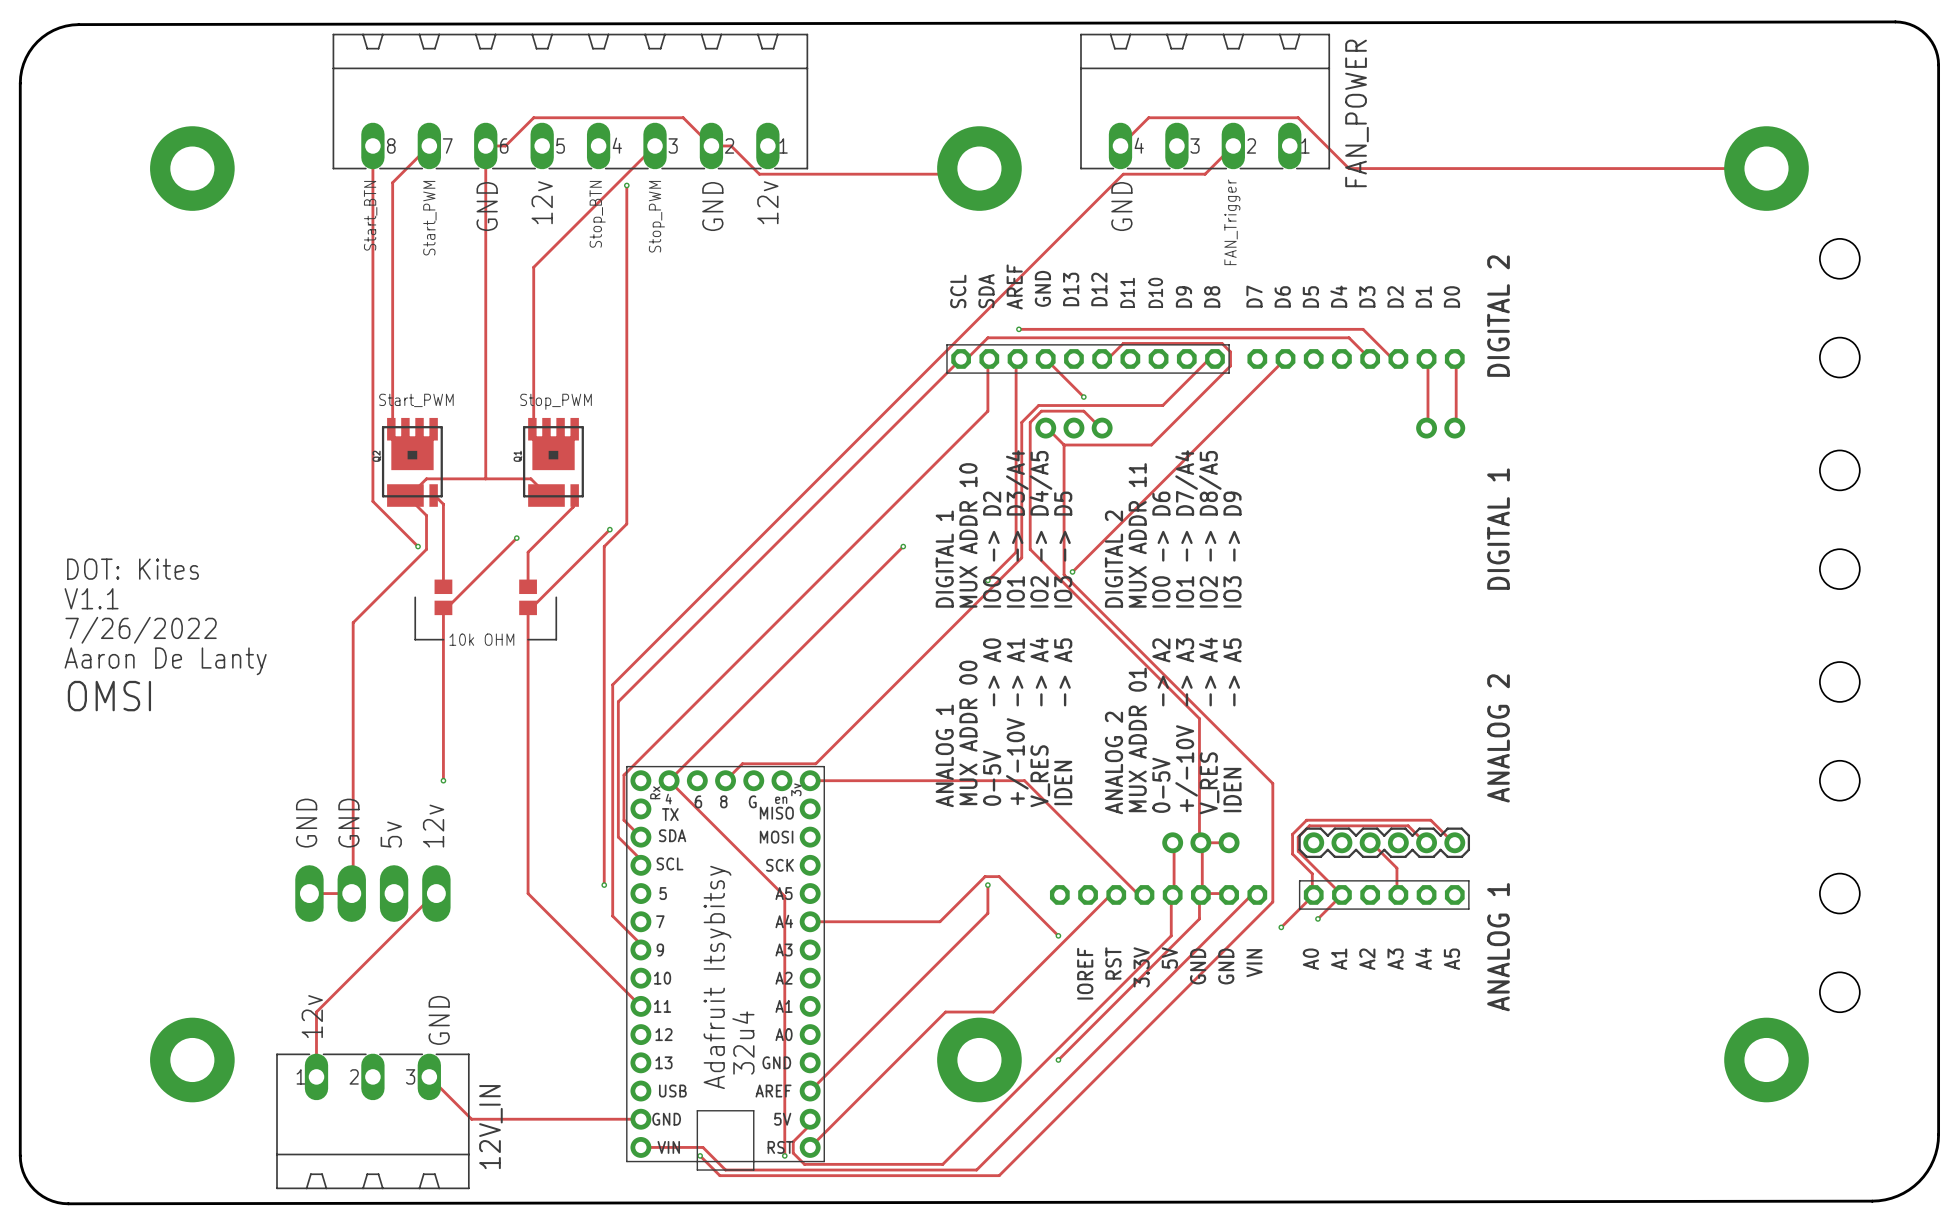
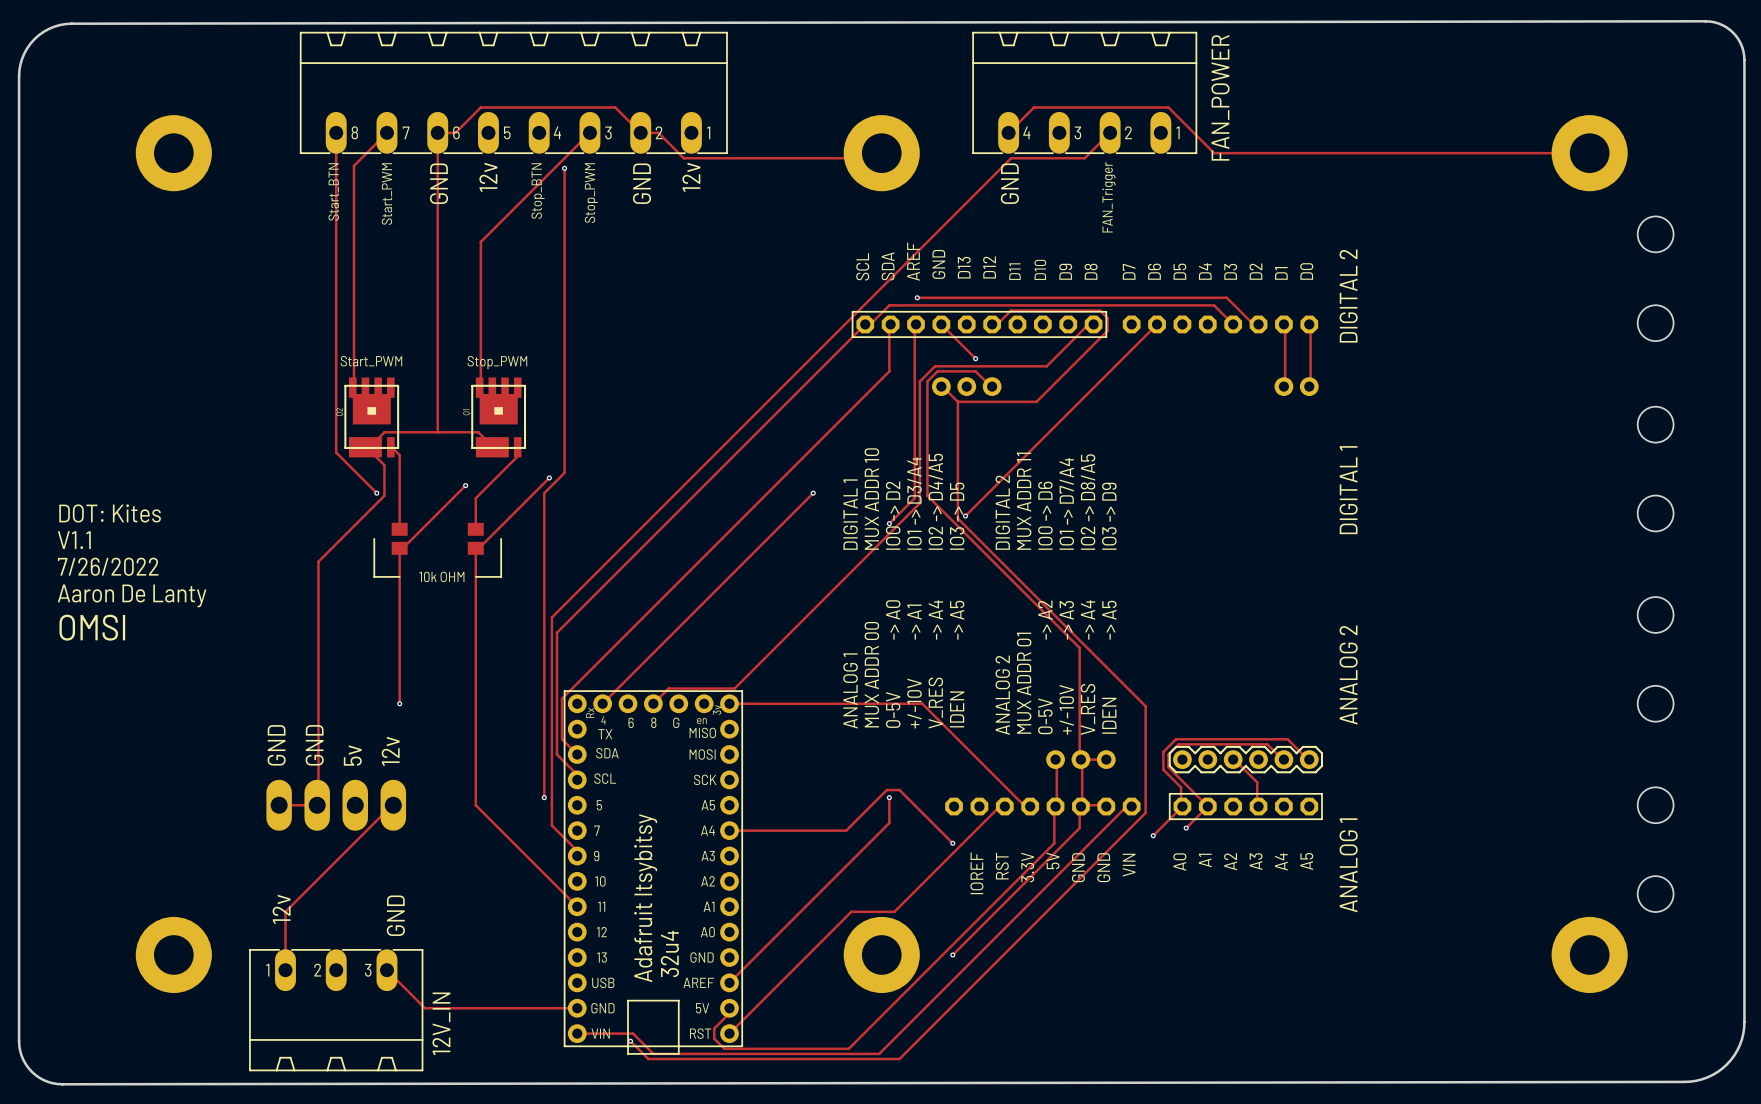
track: (669, 780) (784, 896) (784, 1155) -> none
via: (784, 1155) -> none

